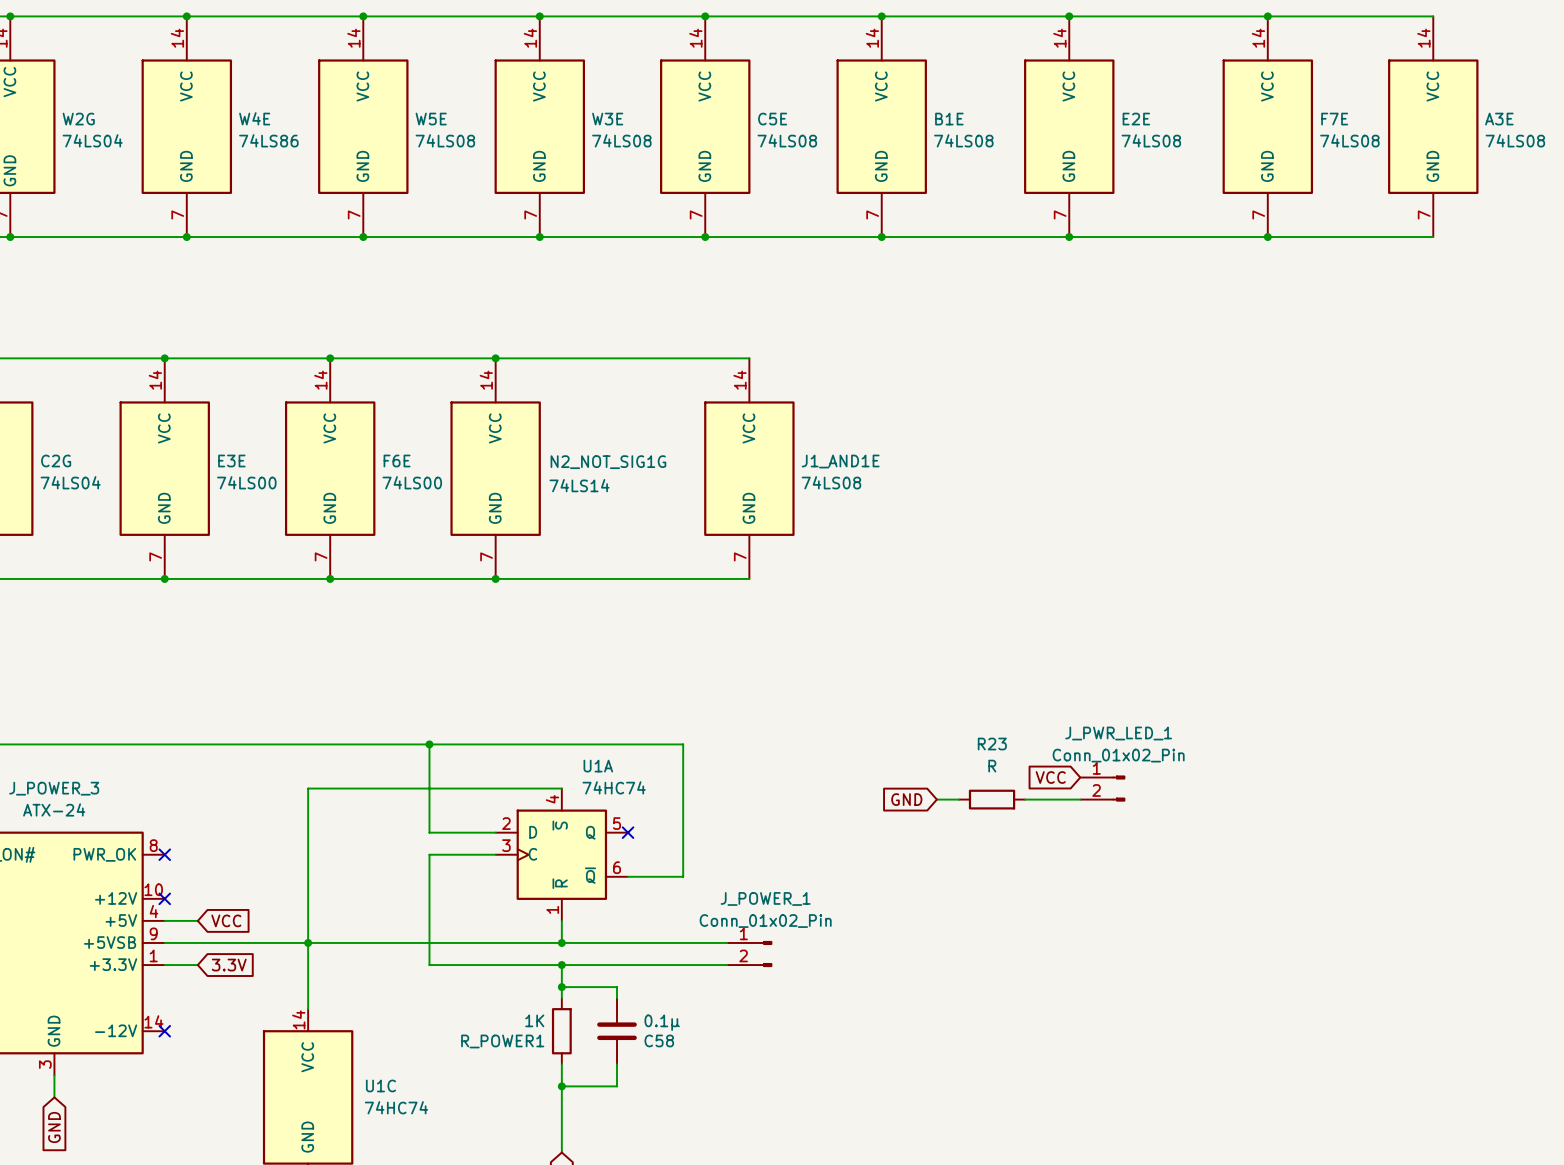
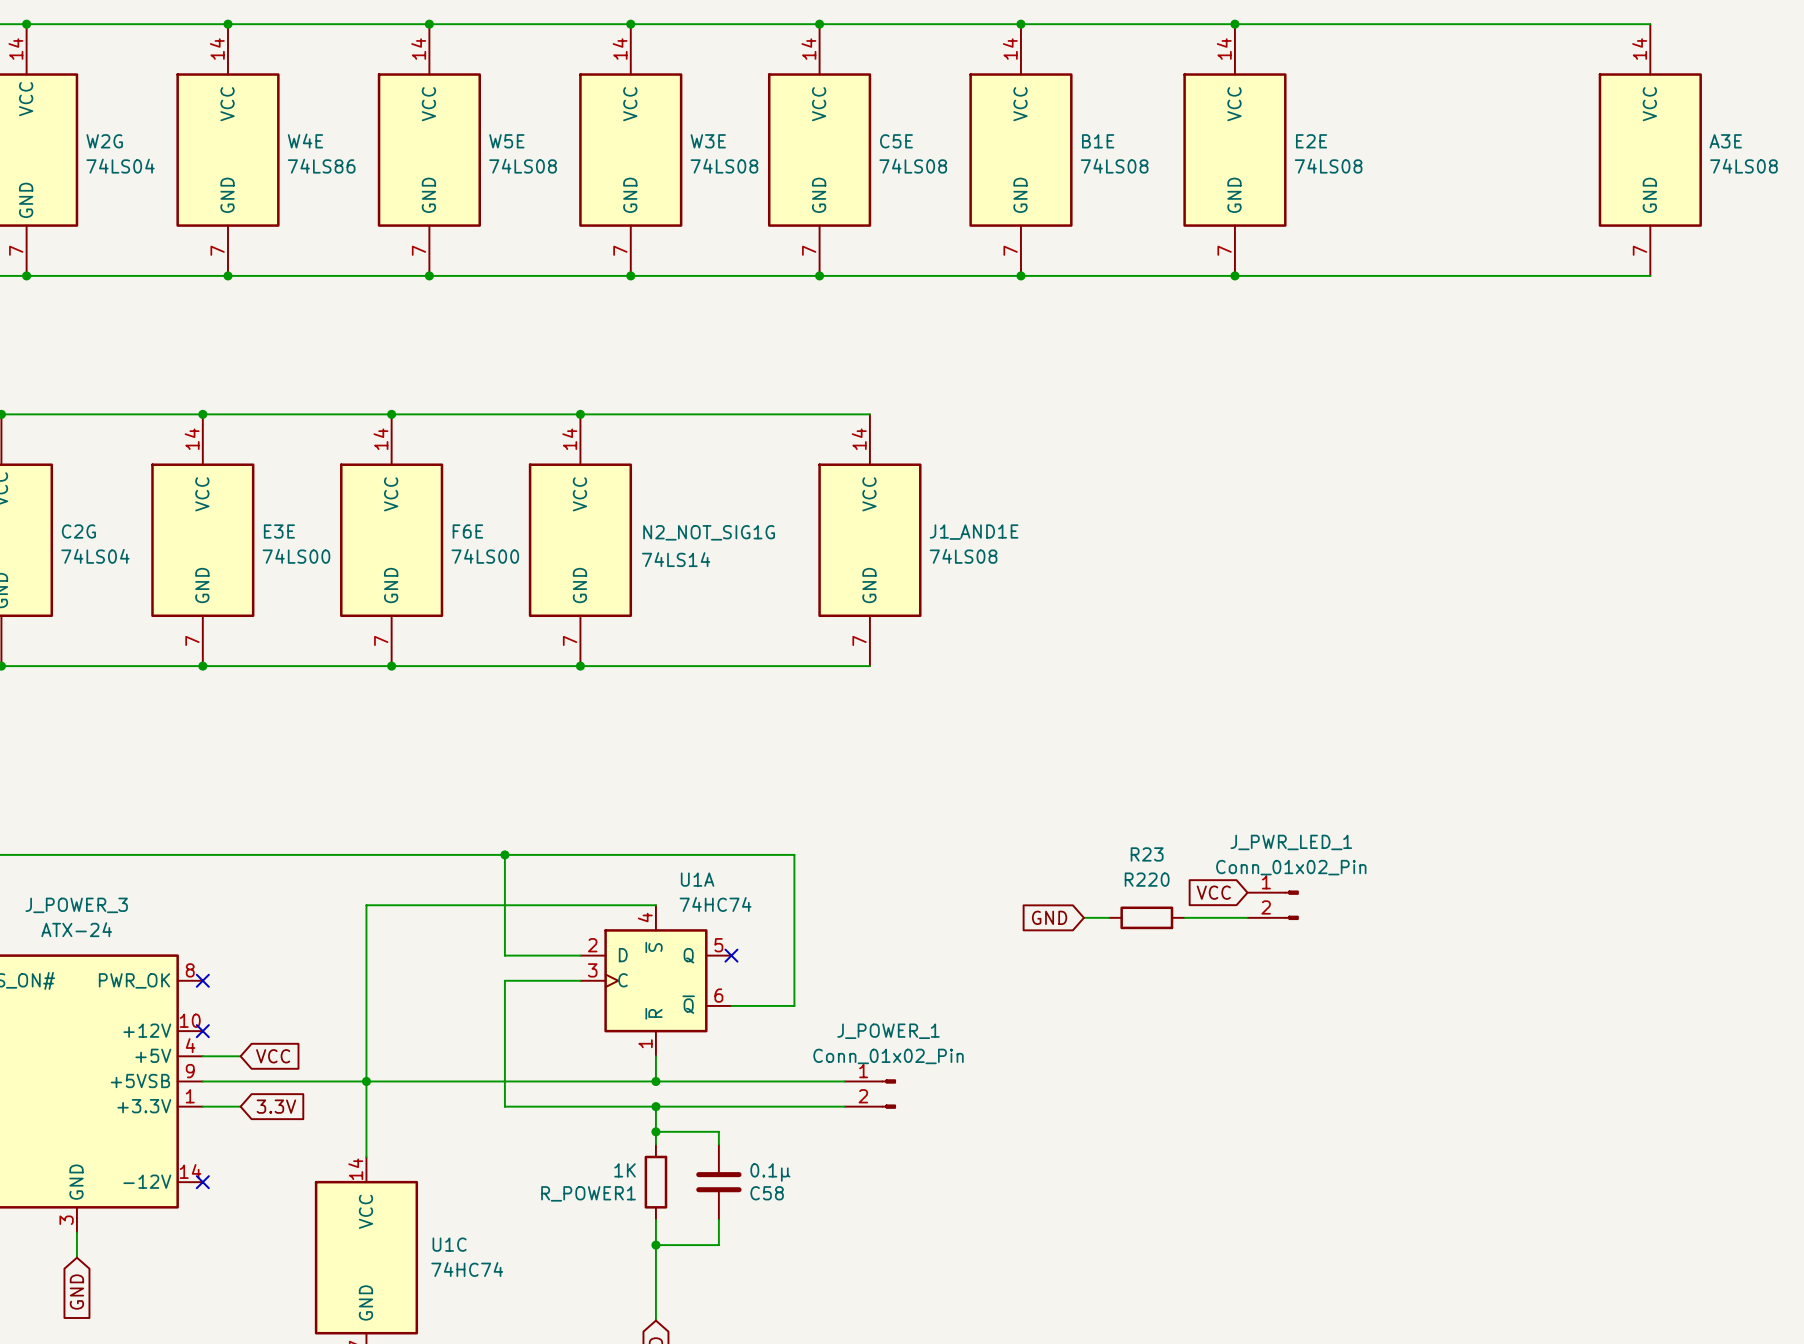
junction: (1267, 16) -> none
F7E: 74LS08 (1267, 126) -> none
junction: (1267, 237) -> none
R23 value: R (992, 766) -> R220 (1147, 879)

